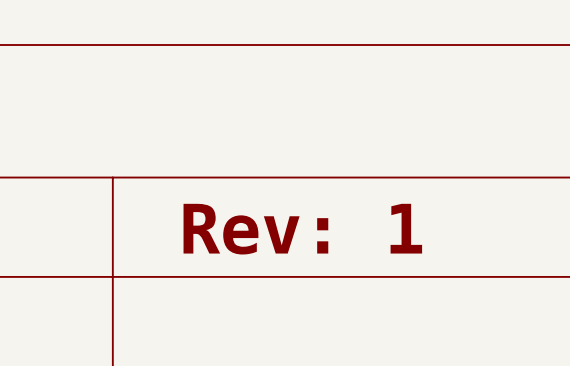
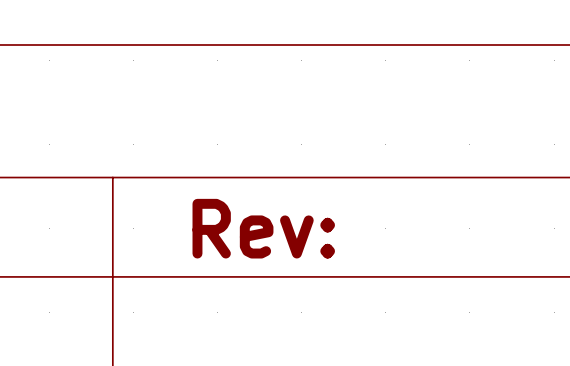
title block: Rev: 1 (302, 229) -> Rev: (263, 228)

